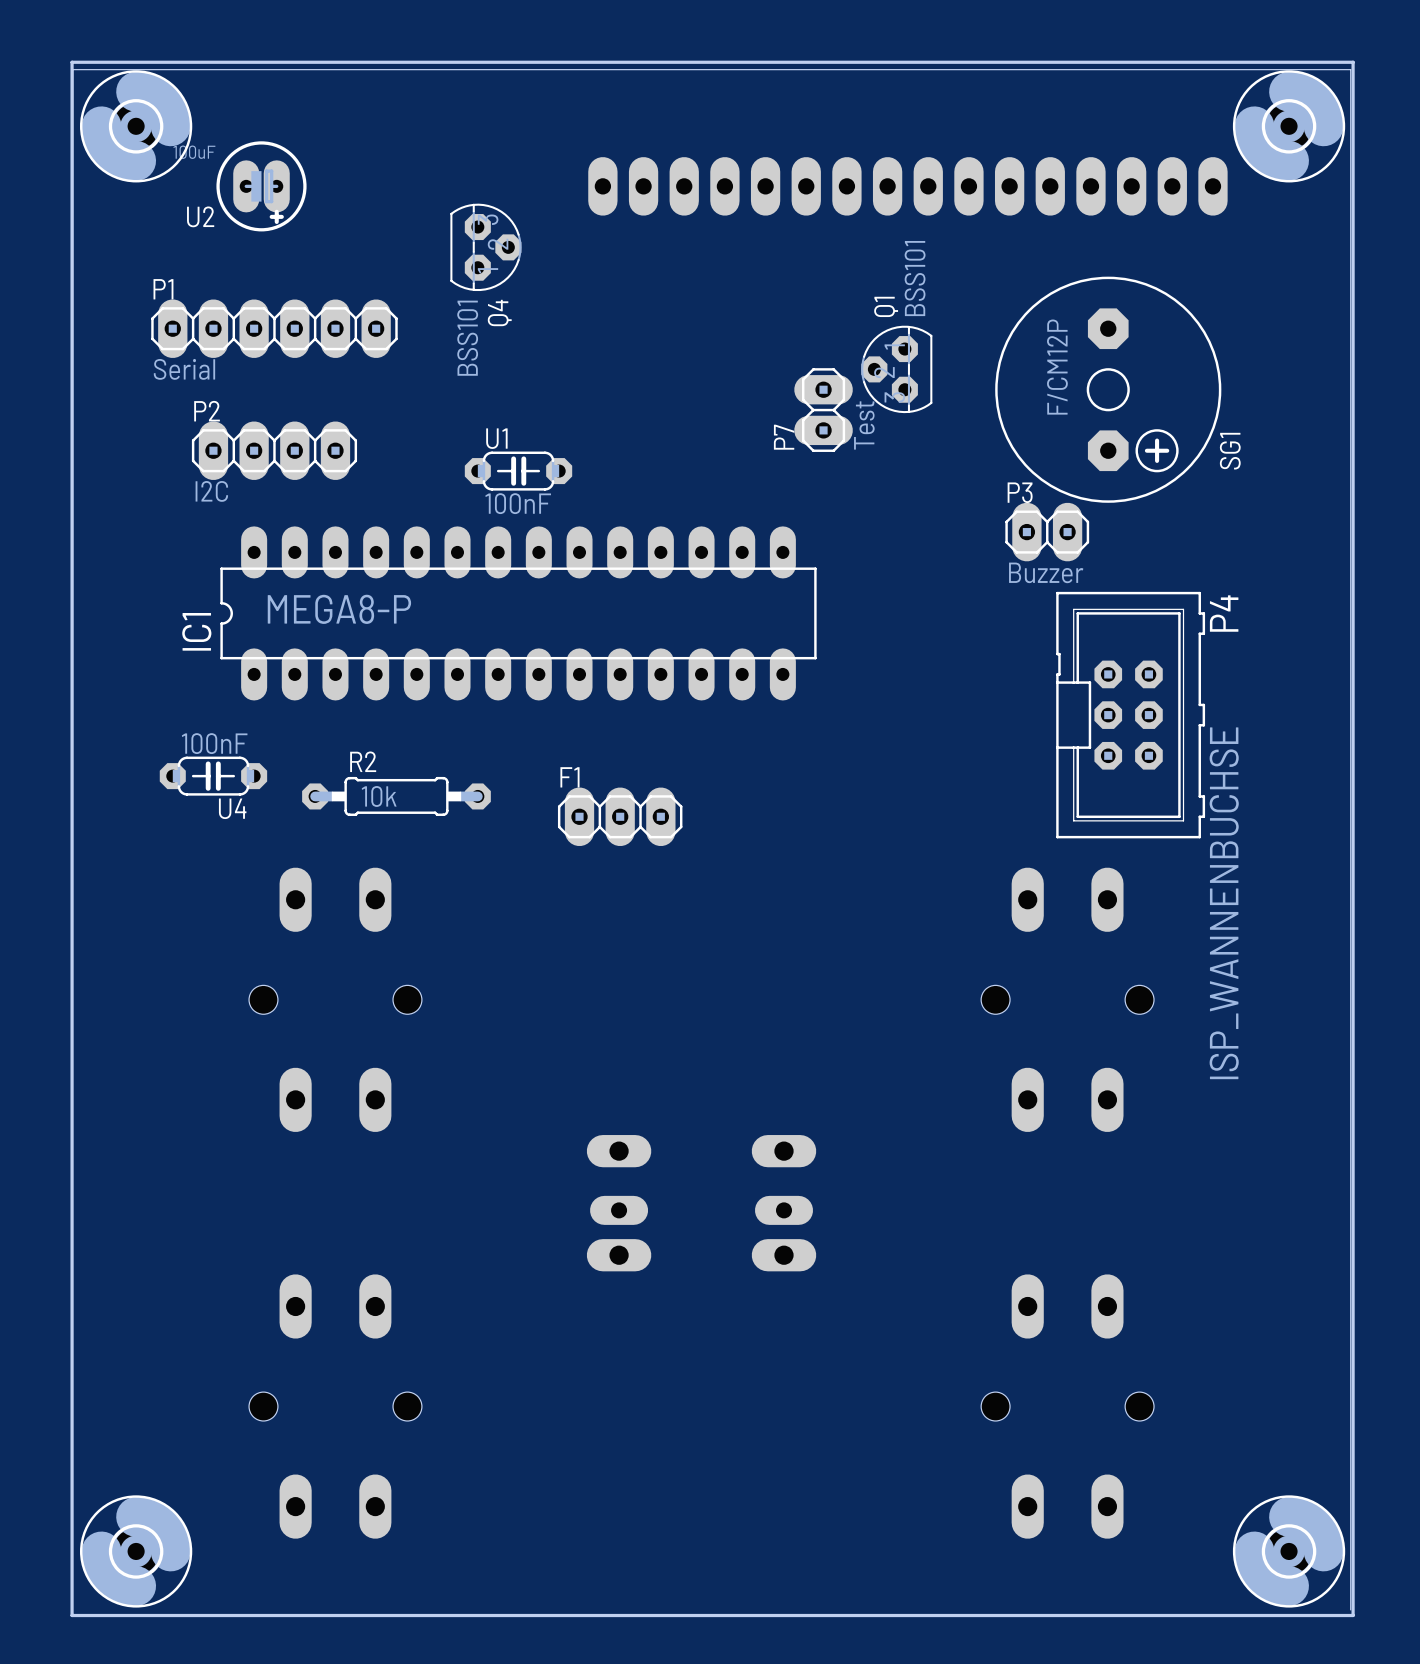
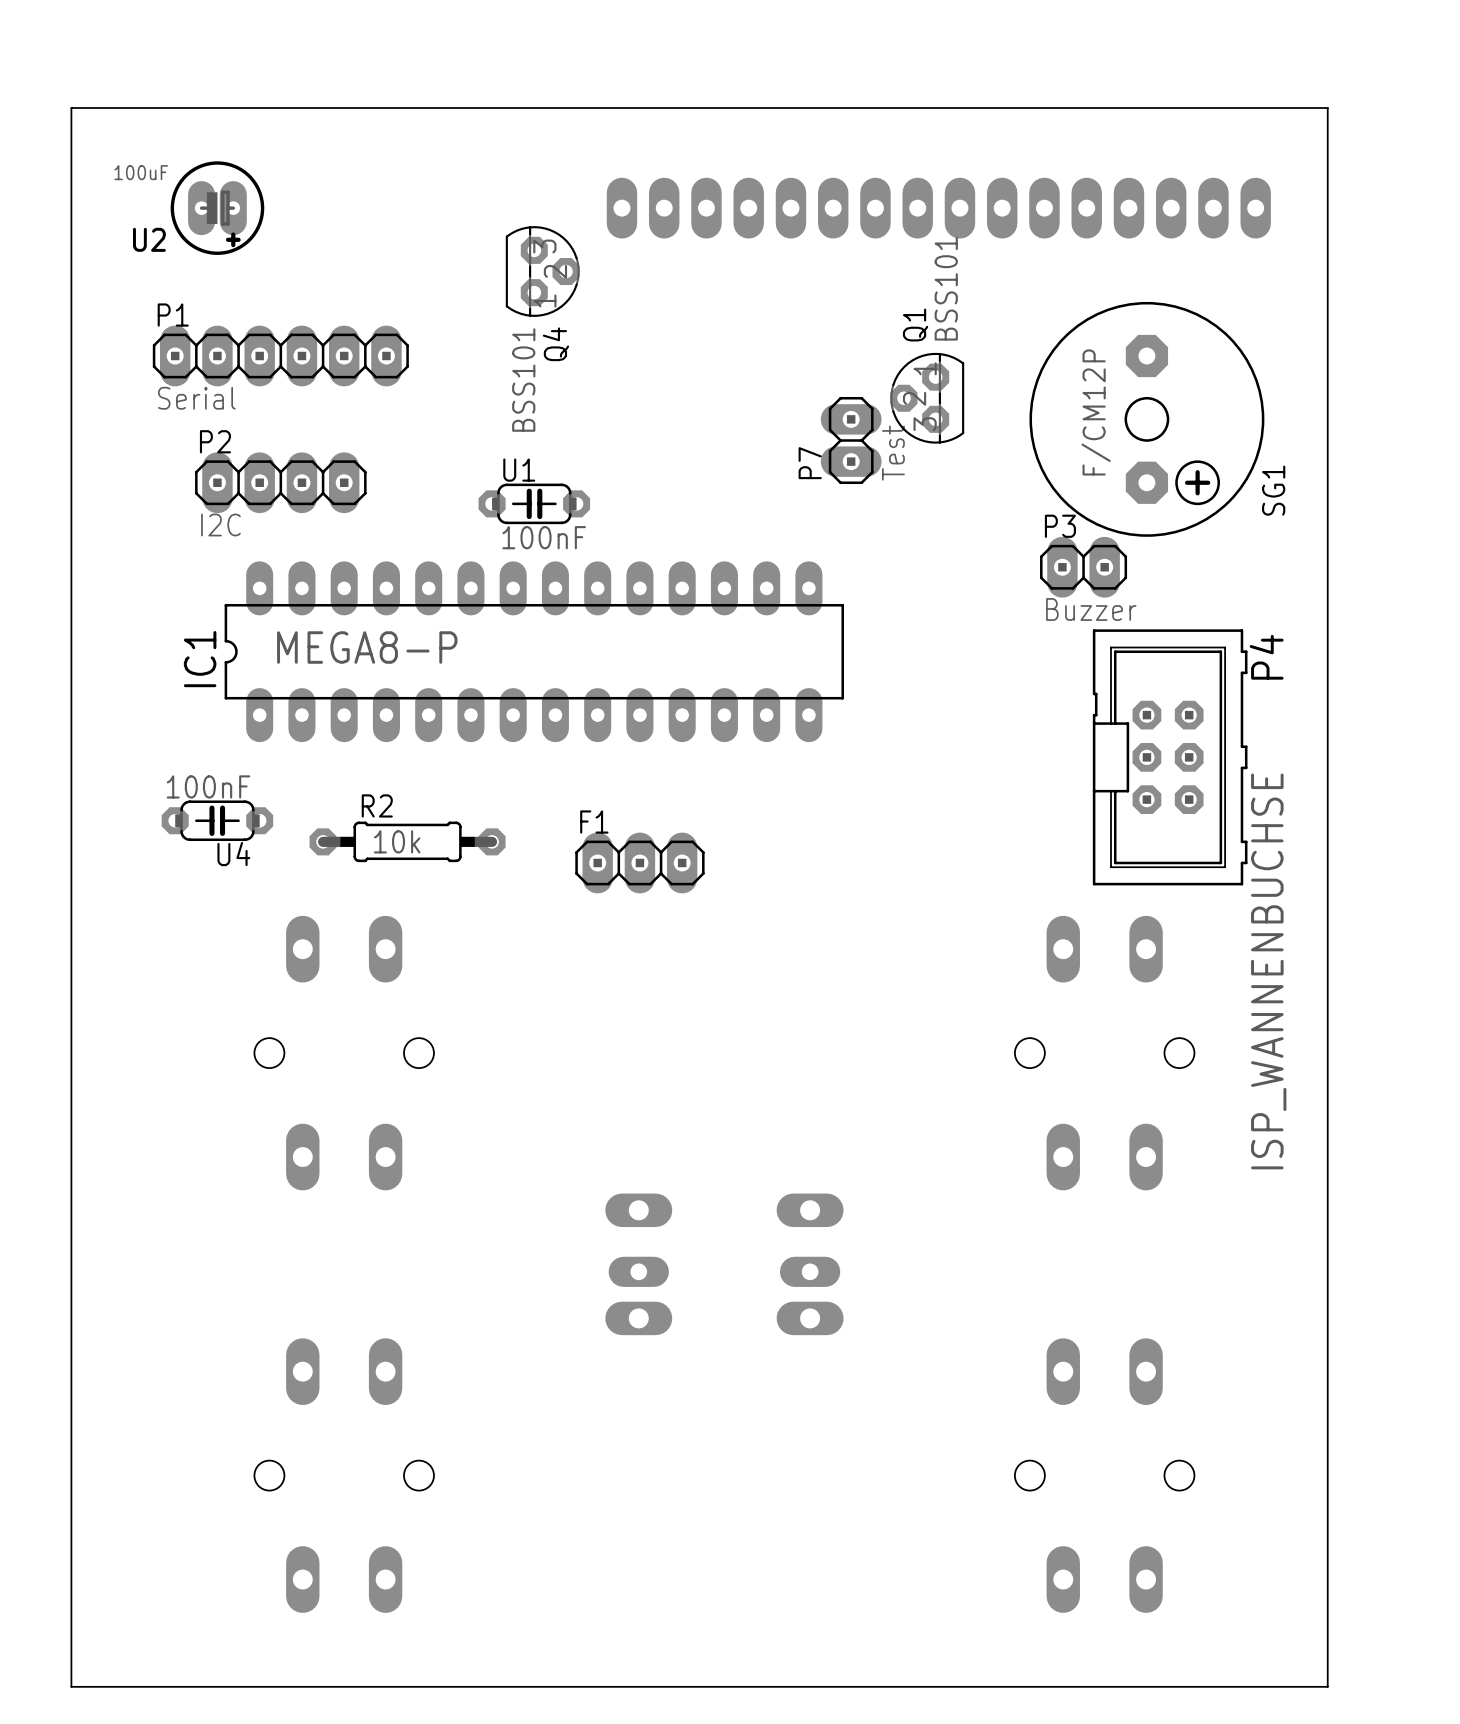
part: (136, 126) -> none
part: (1289, 126) -> none
U2 position: (261, 186) -> (217, 208)
Q4 position: (485, 247) -> (542, 271)
part: (136, 1551) -> none
part: (1289, 1551) -> none
board edge: (1350, 1609) (1350, 69) (72, 69) (72, 1615) -> none
board edge: (72, 1615) (1353, 1615) (1353, 62) (72, 62) (72, 1615) -> (71, 108) (71, 1686) (1327, 1686) (1327, 108) (71, 108)

